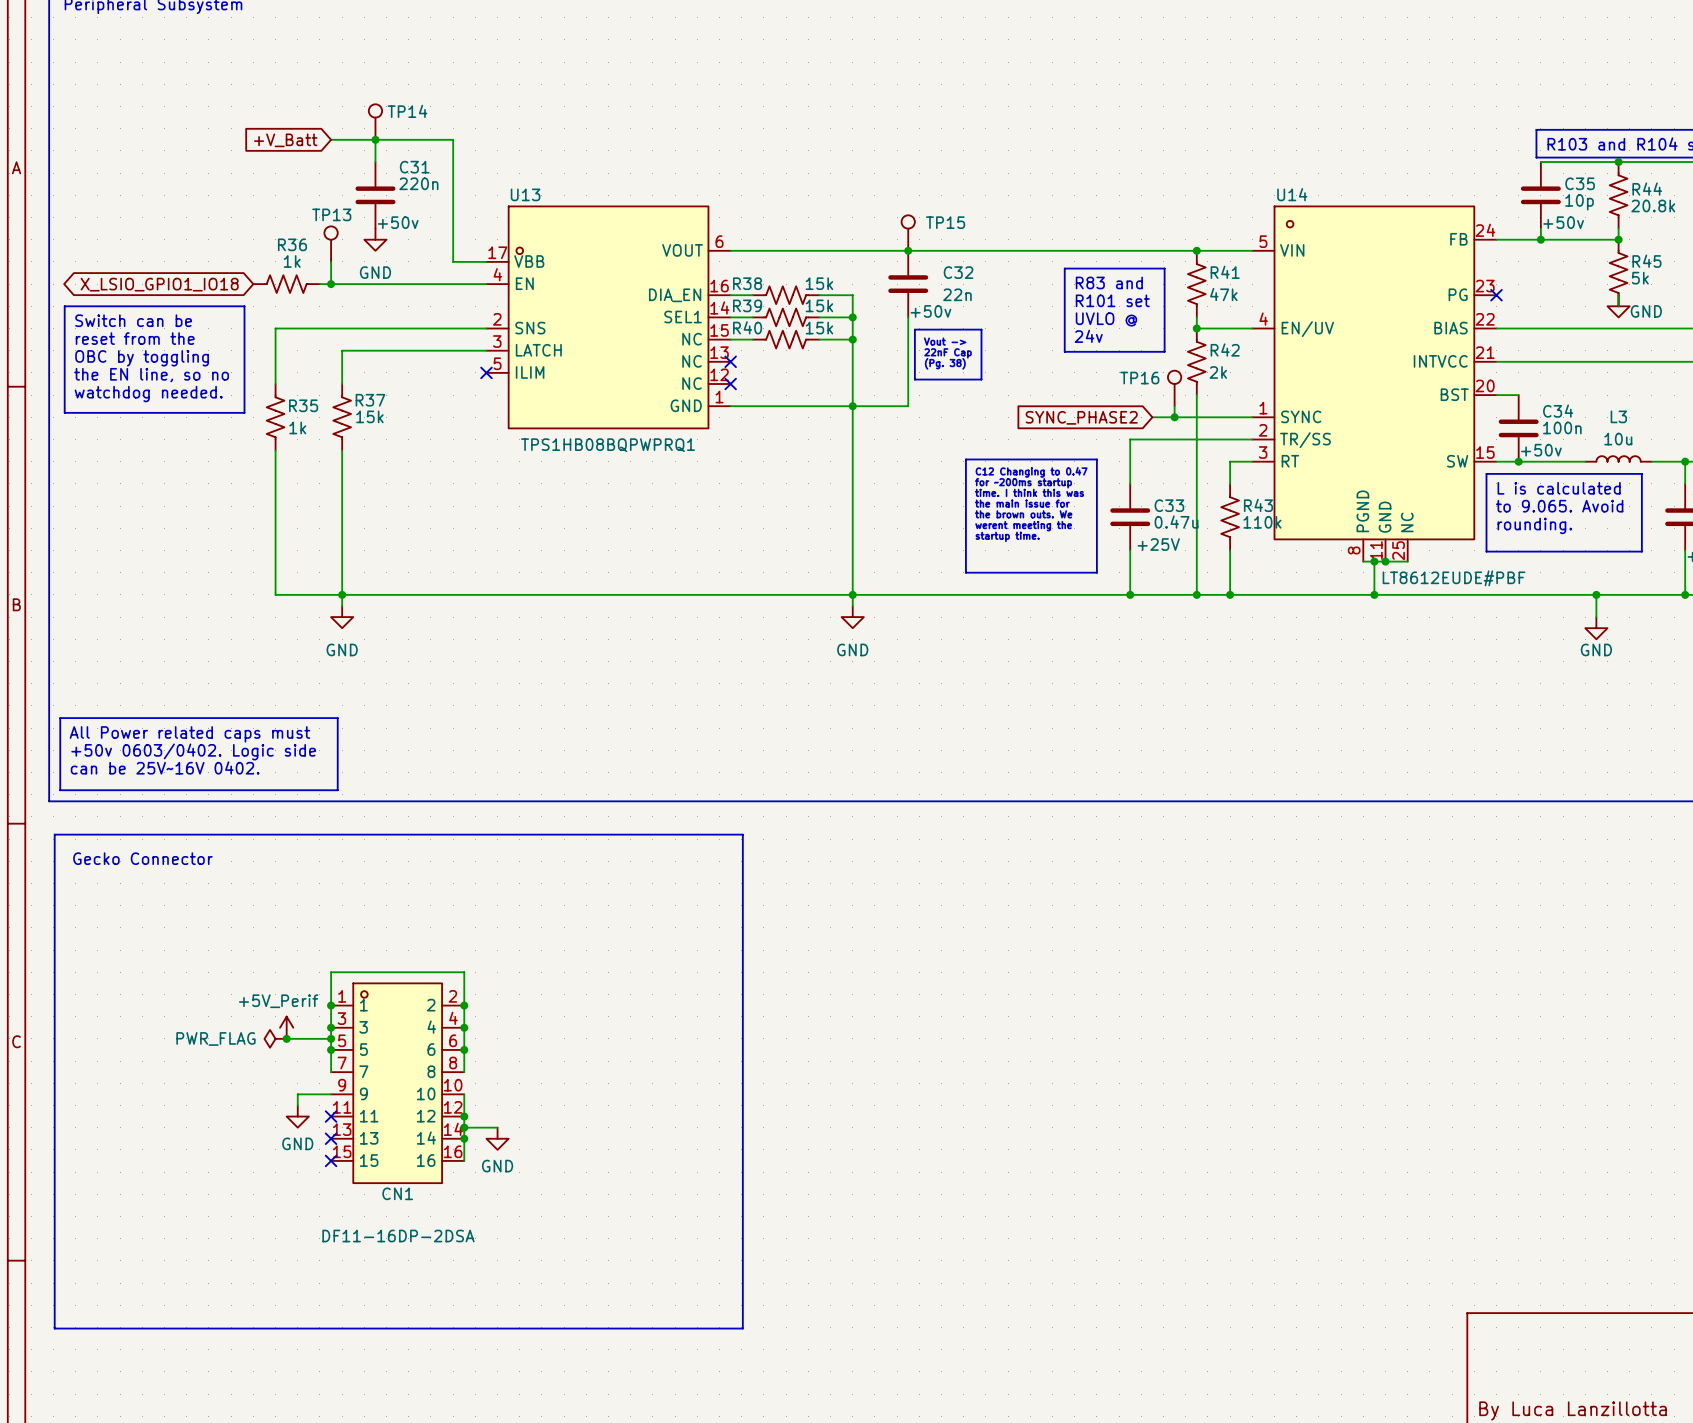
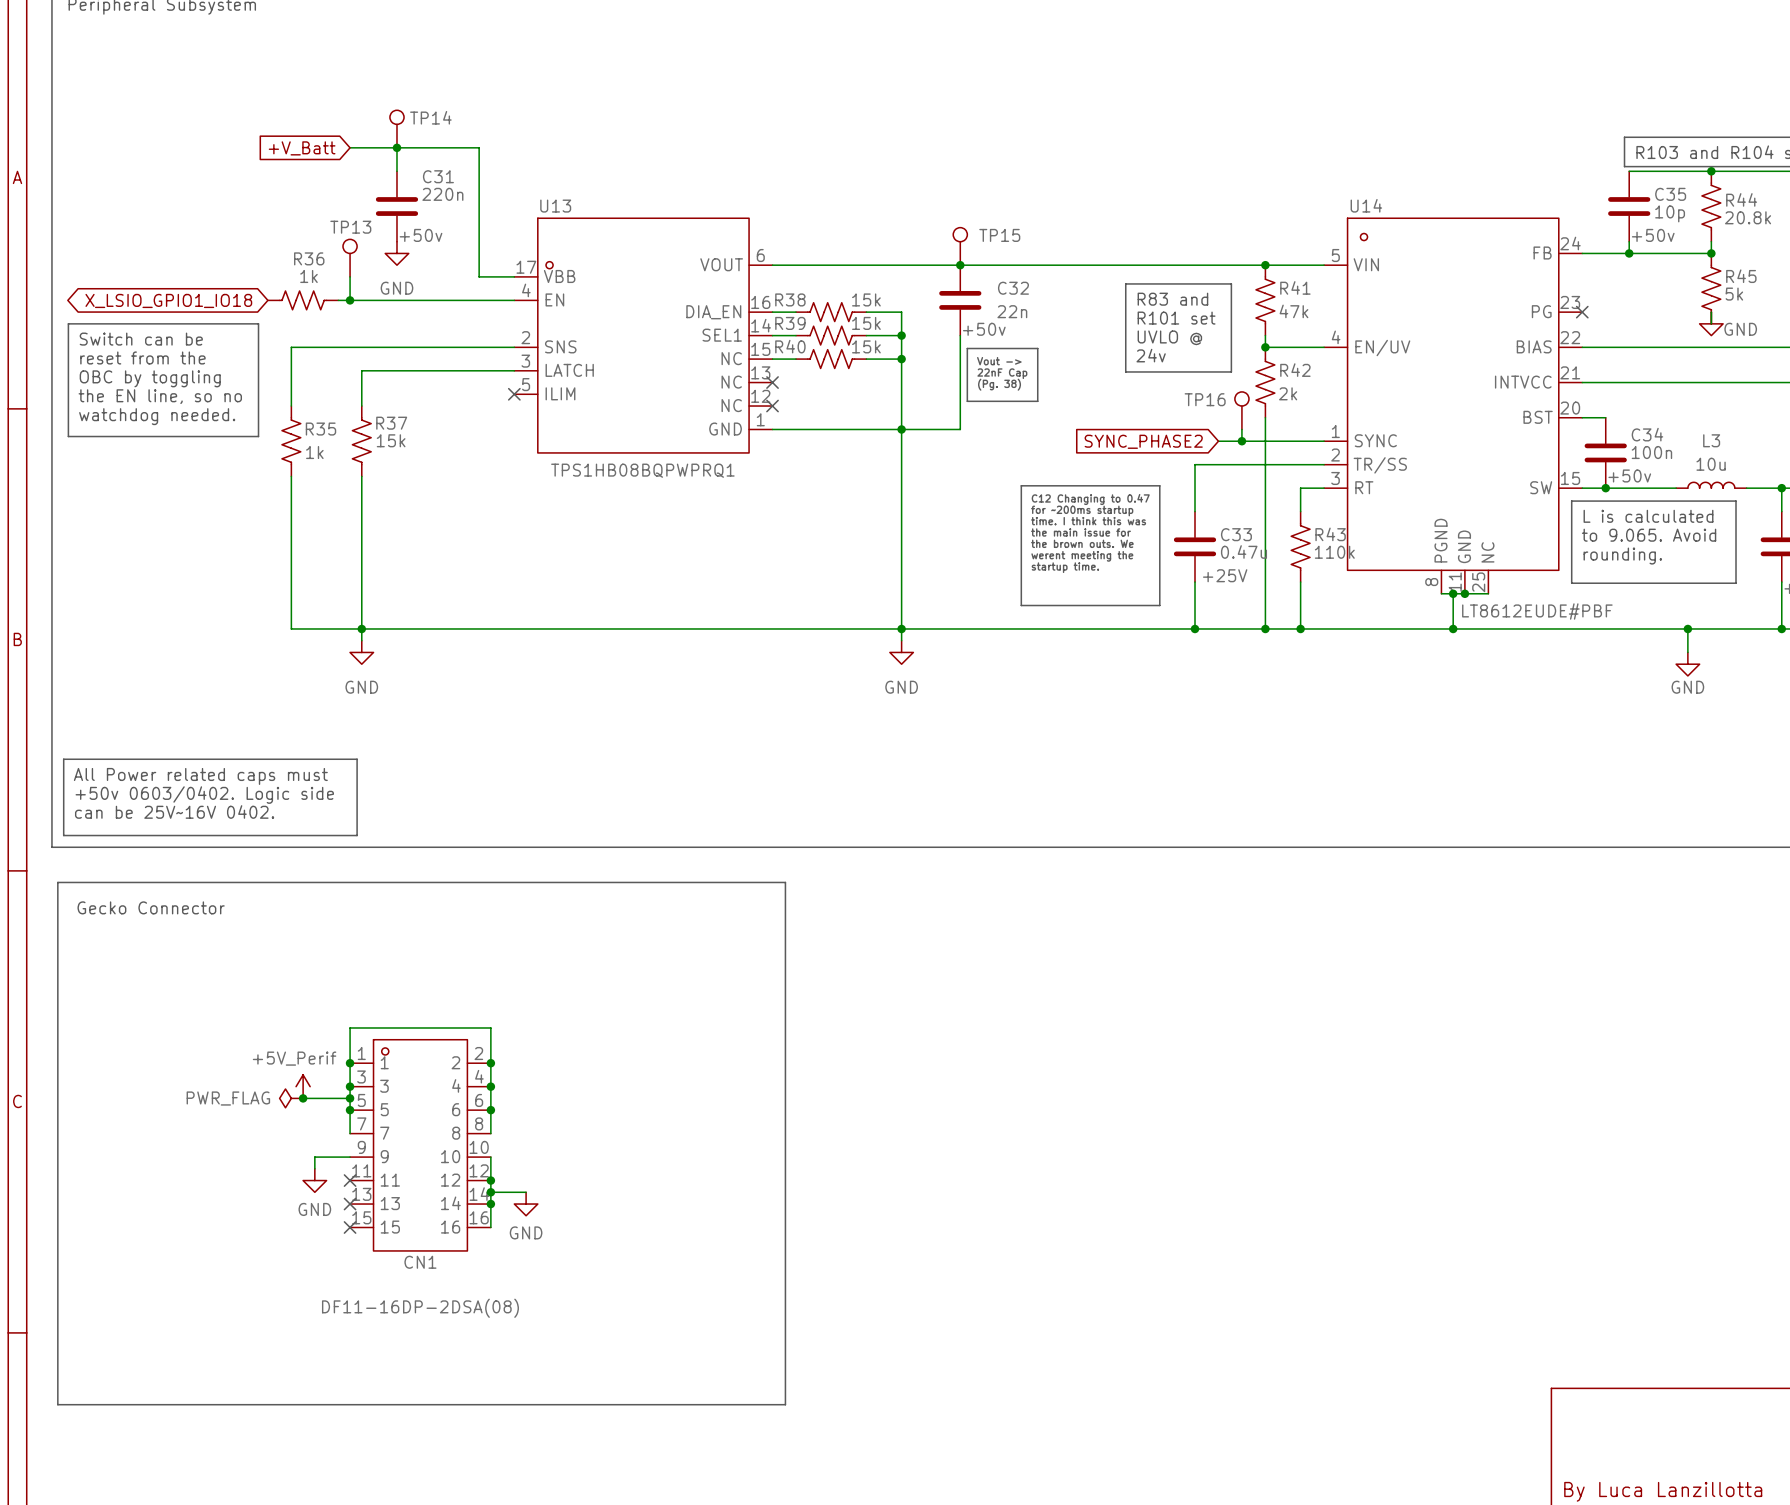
CN1 value: DF11-16DP-2DSA (398, 1236) -> DF11-16DP-2DSA(08) (420, 1308)

